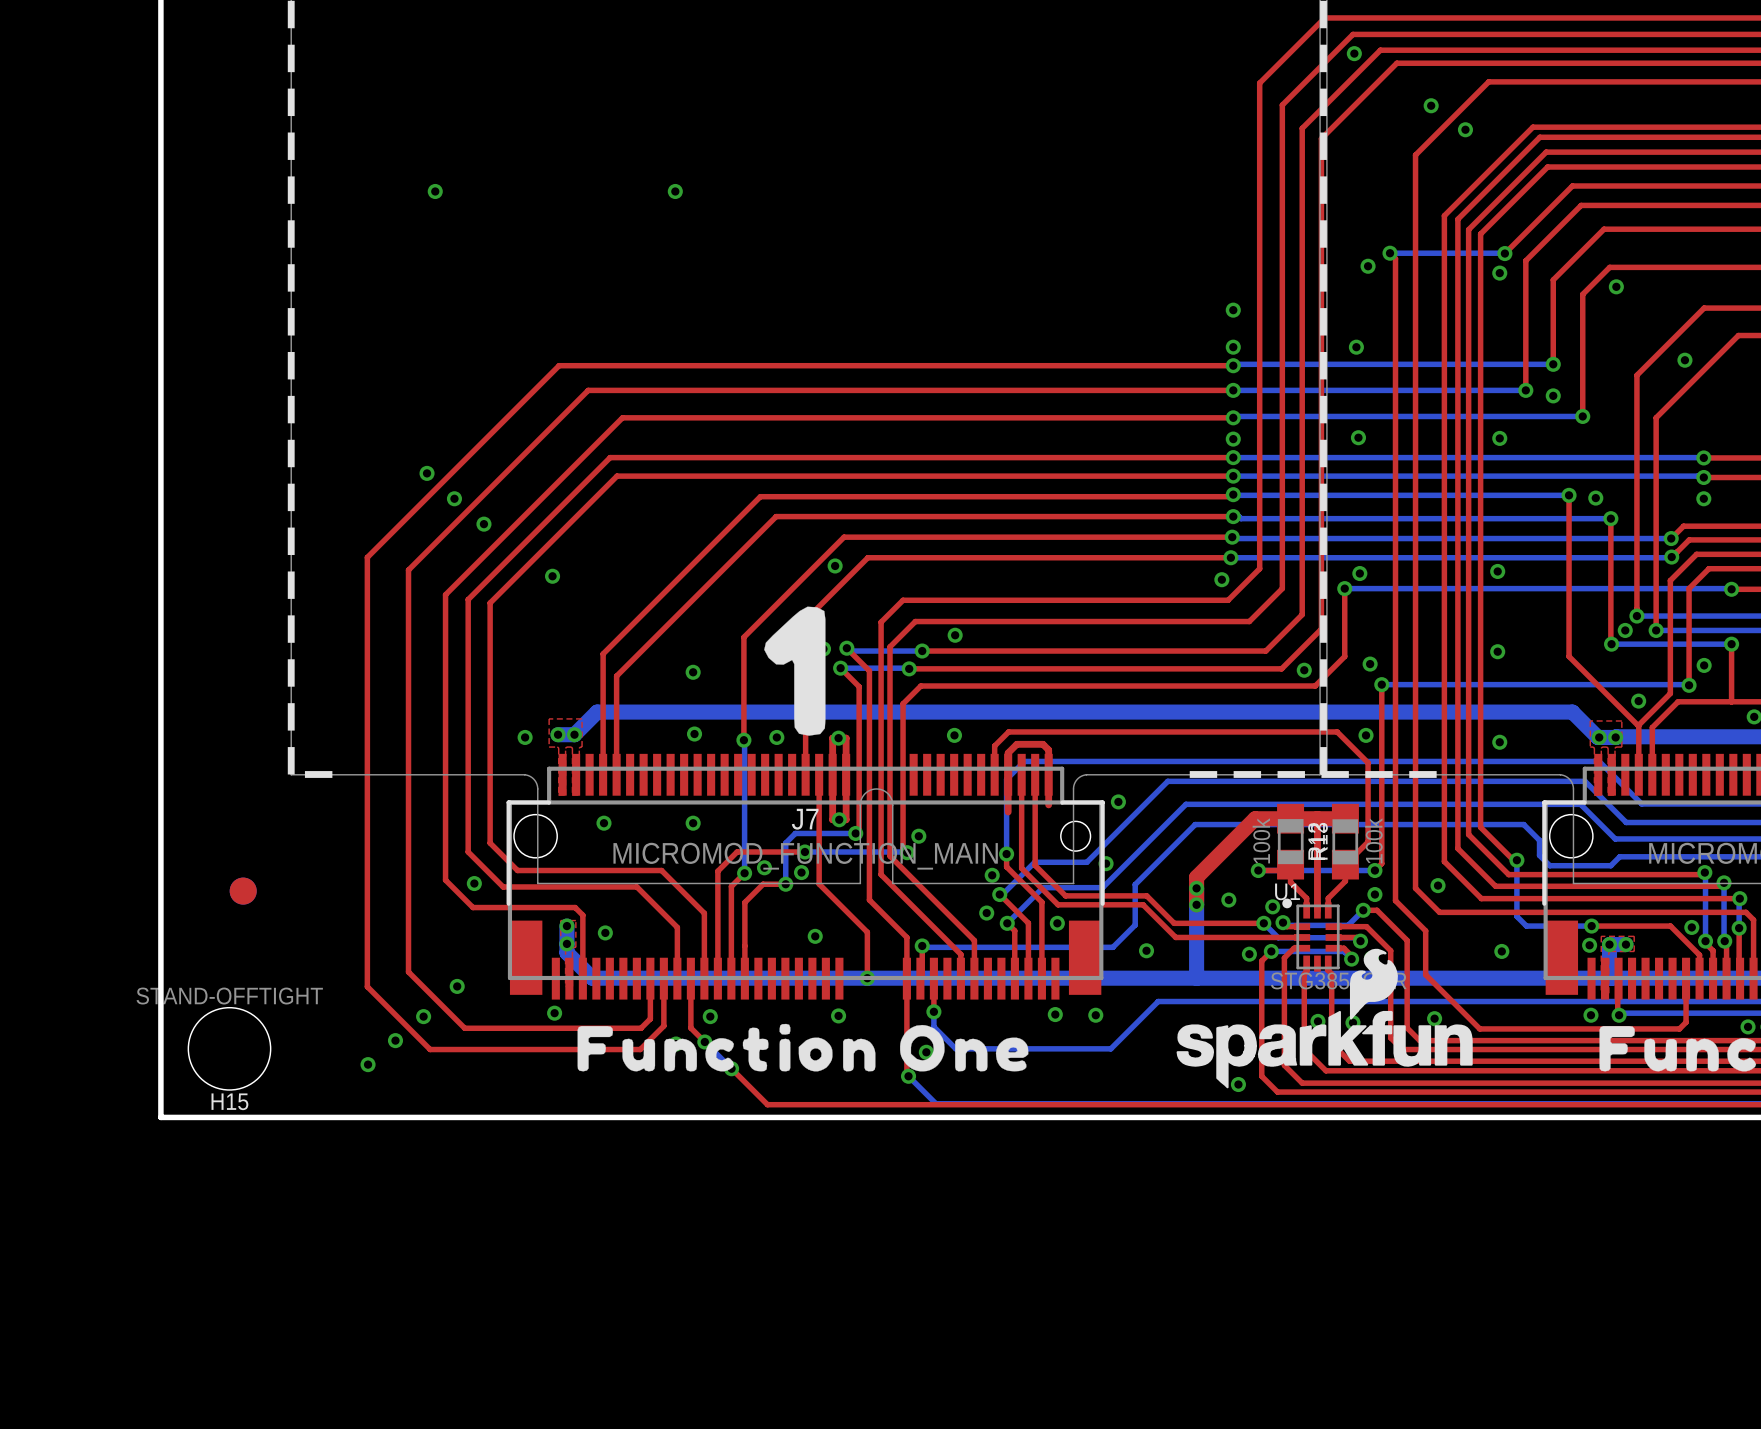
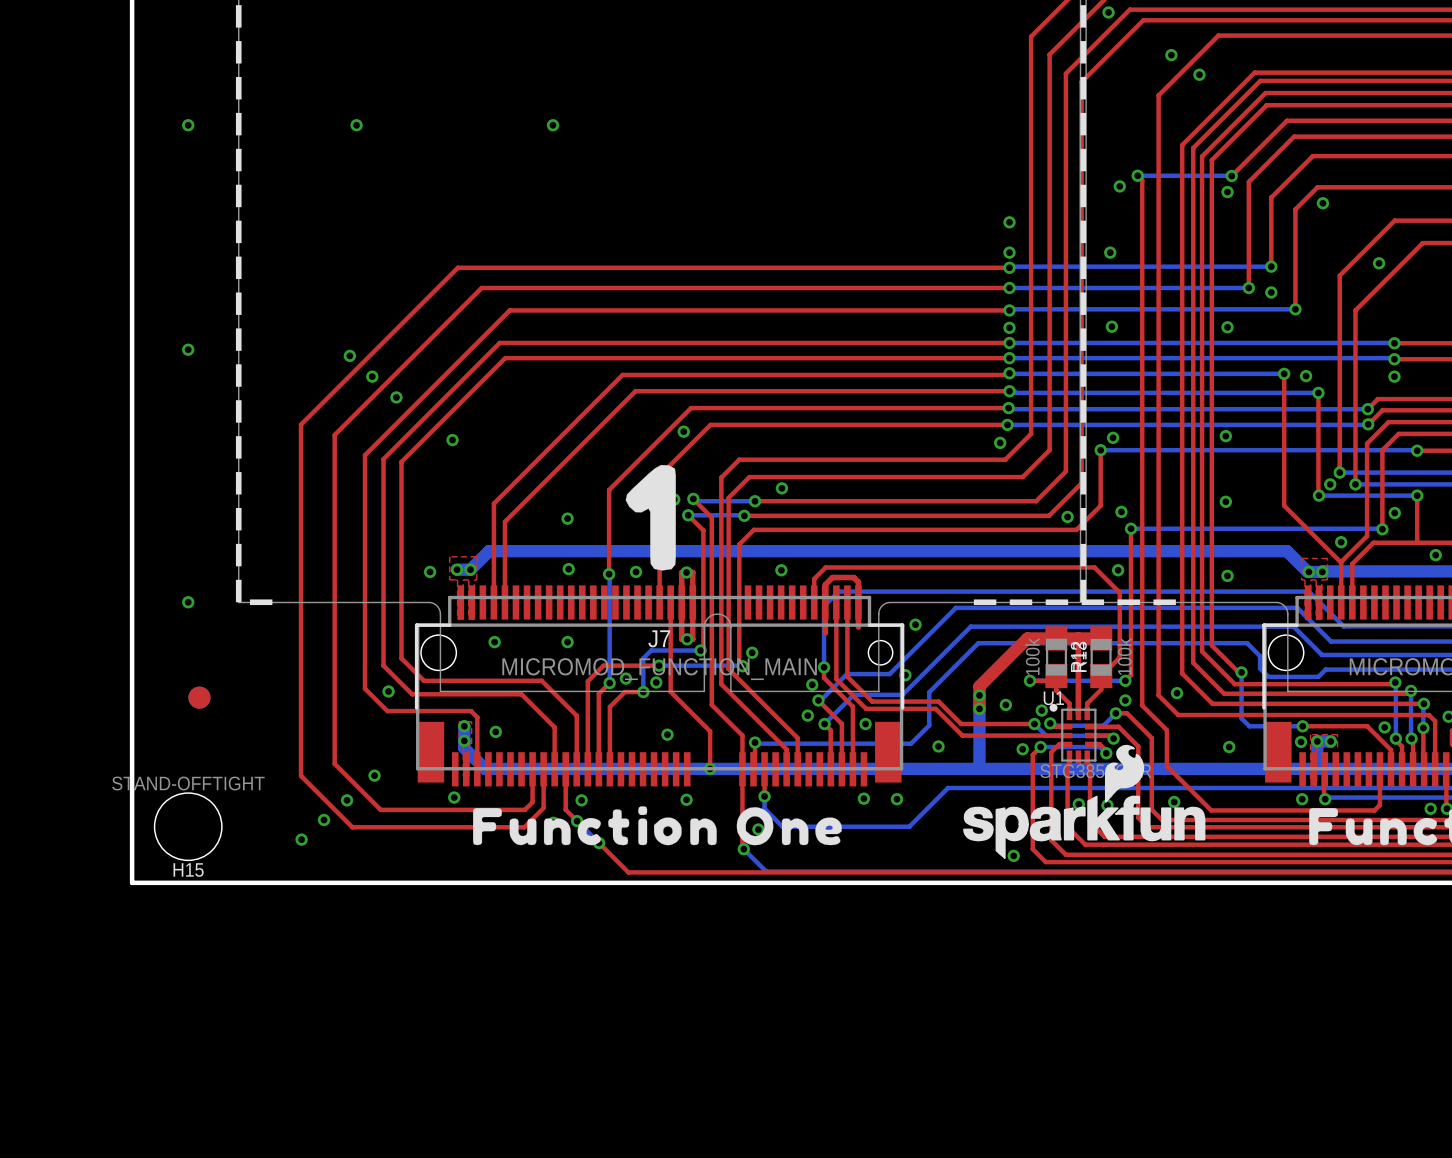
via: none -> (188, 125)
via: none -> (188, 349)
via: none -> (188, 602)

